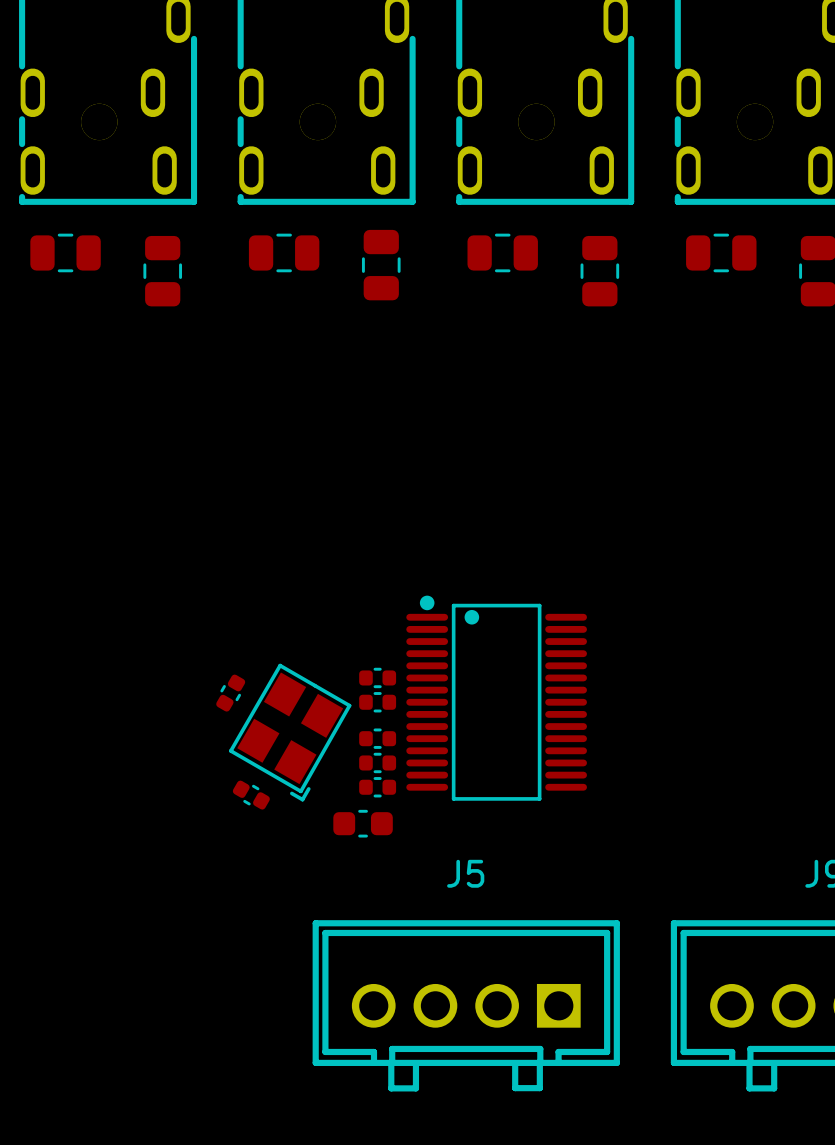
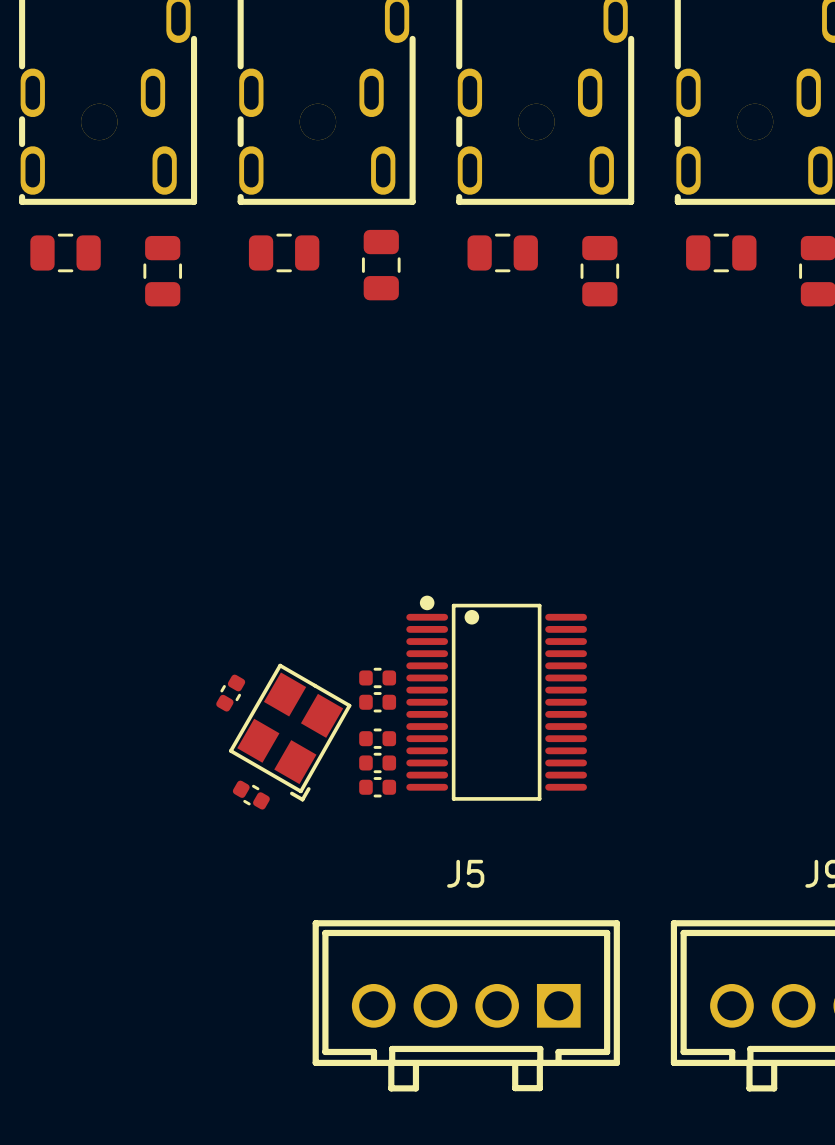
part: (363, 823) -> none

